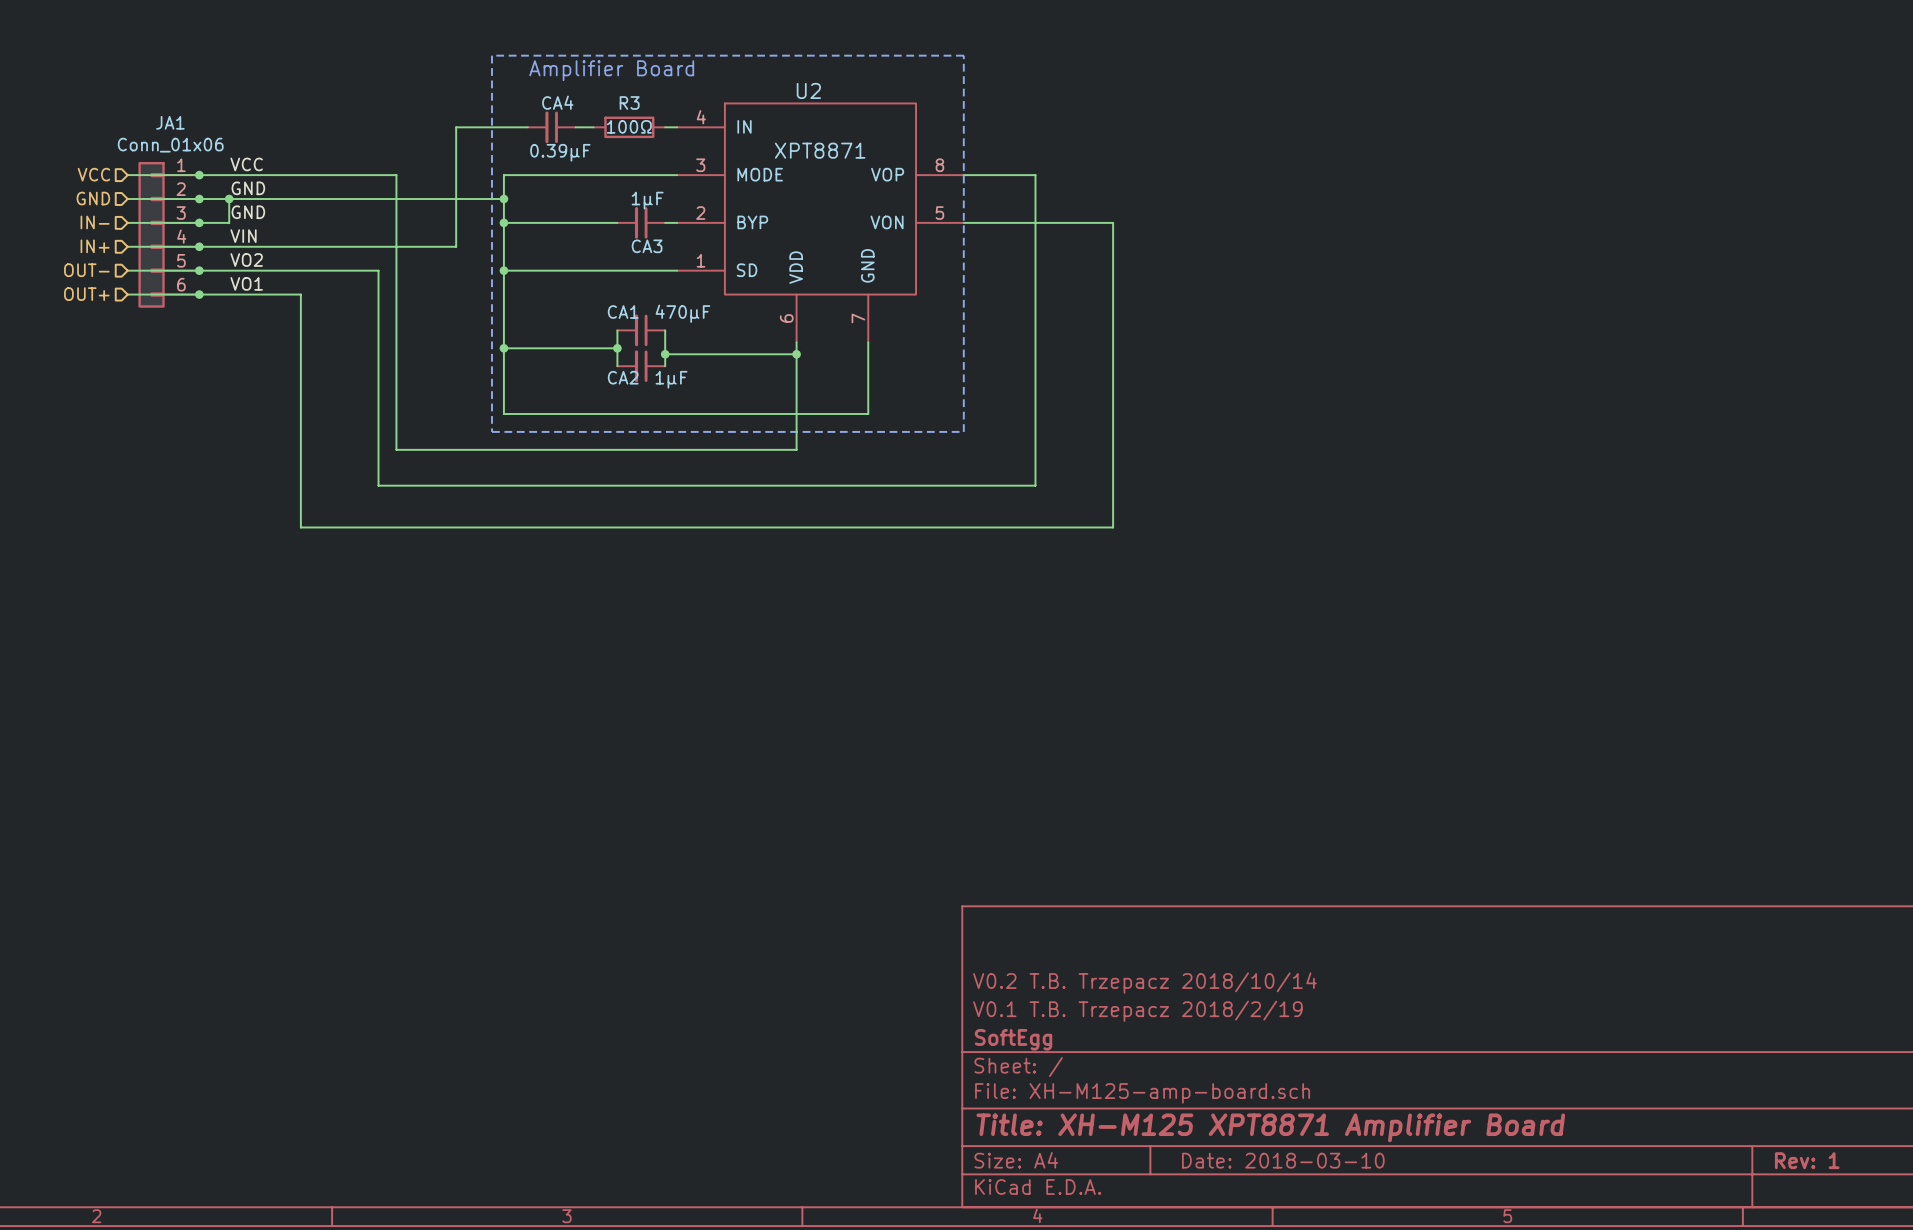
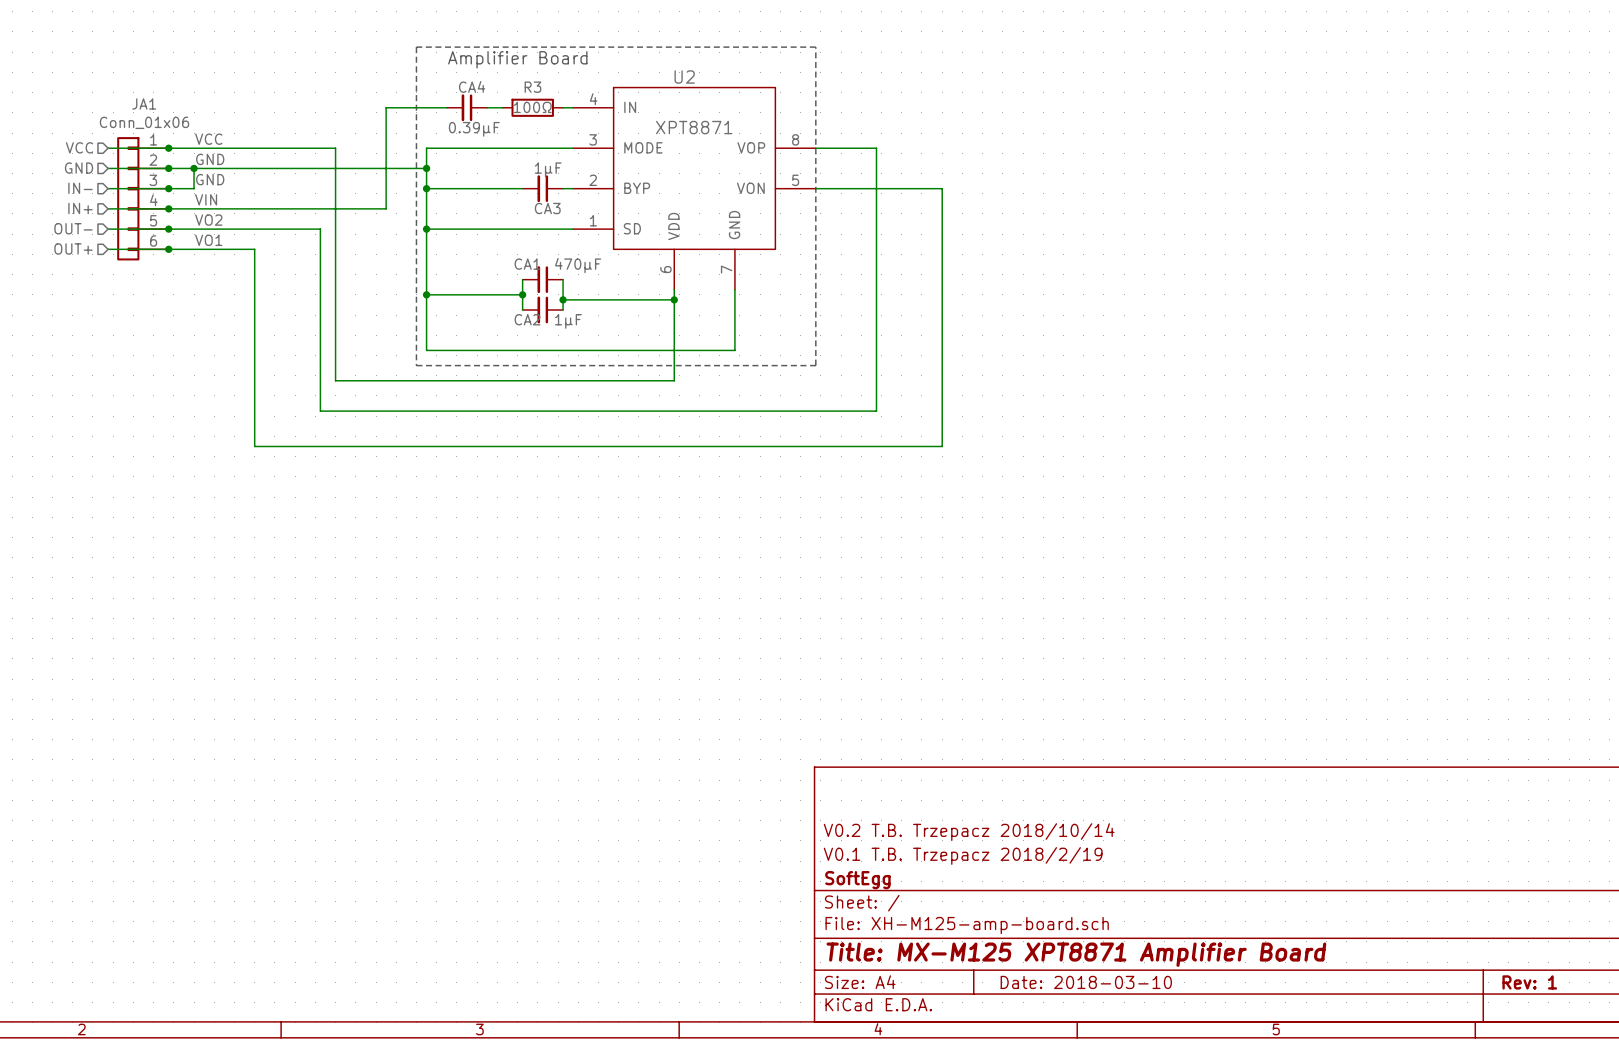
title block: Title: XH-M125 XPT8871 Amplifier Board (1270, 1127) -> Title: MX-M125 XPT8871 Amplifier Board (1076, 954)

